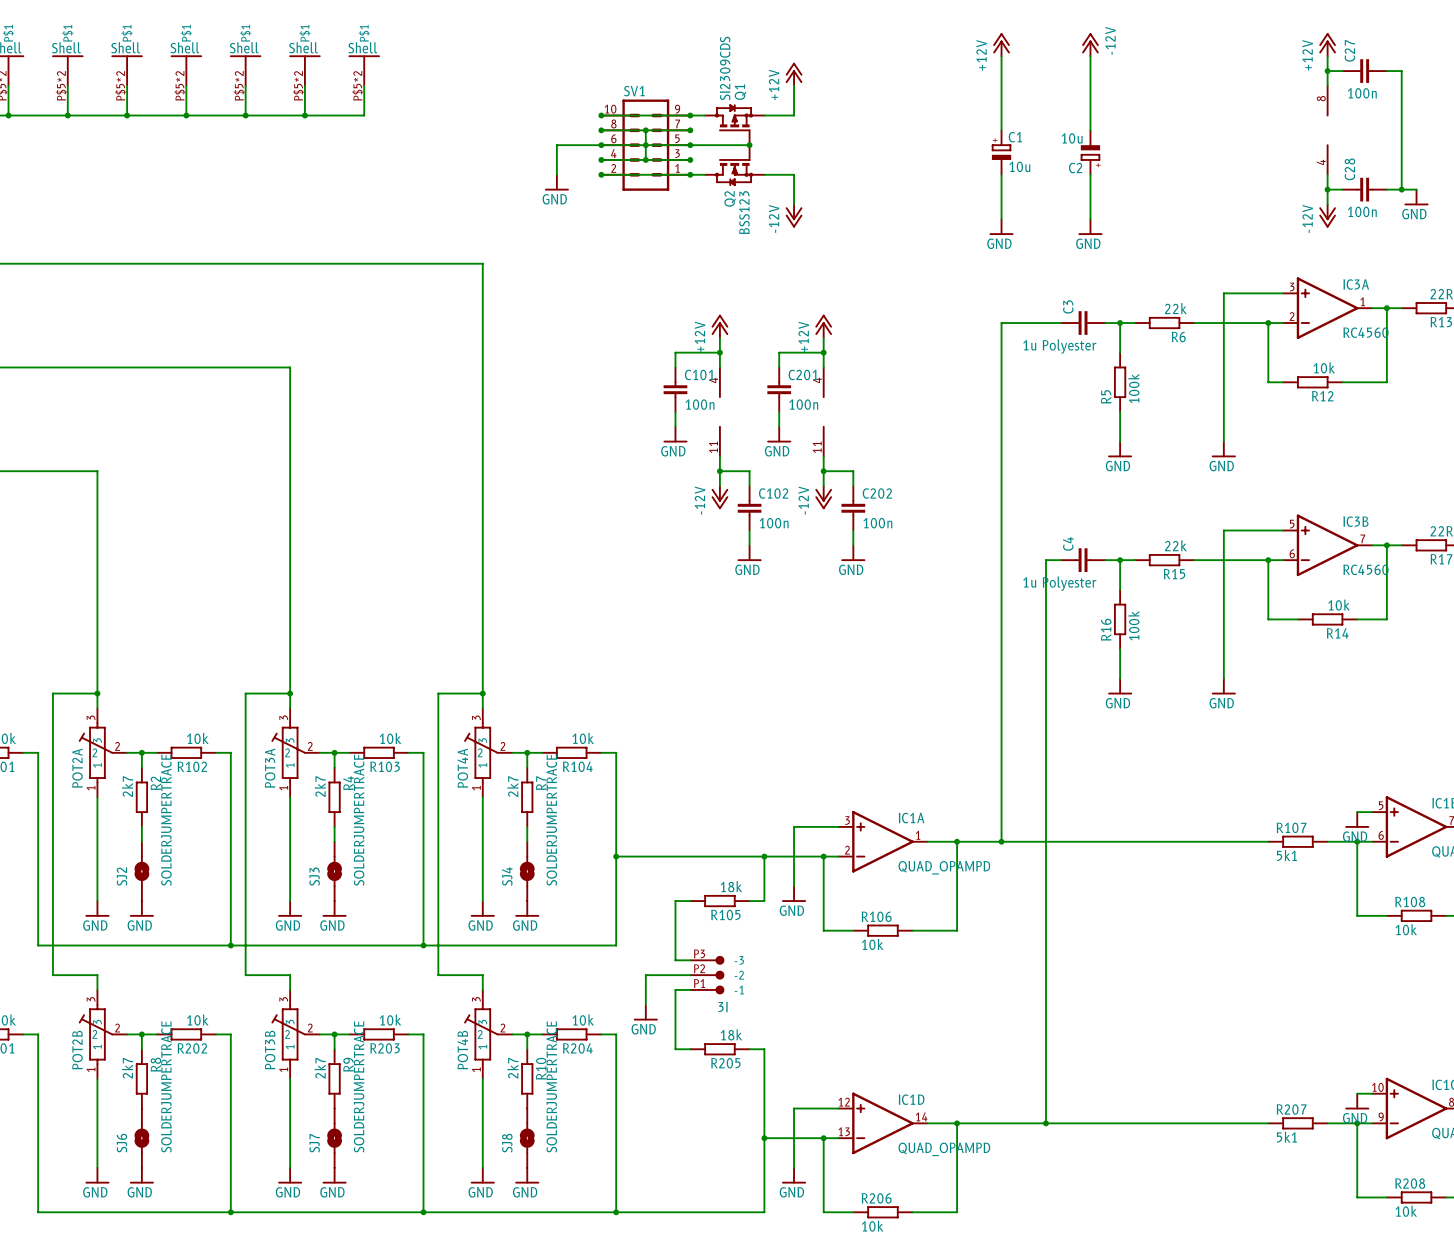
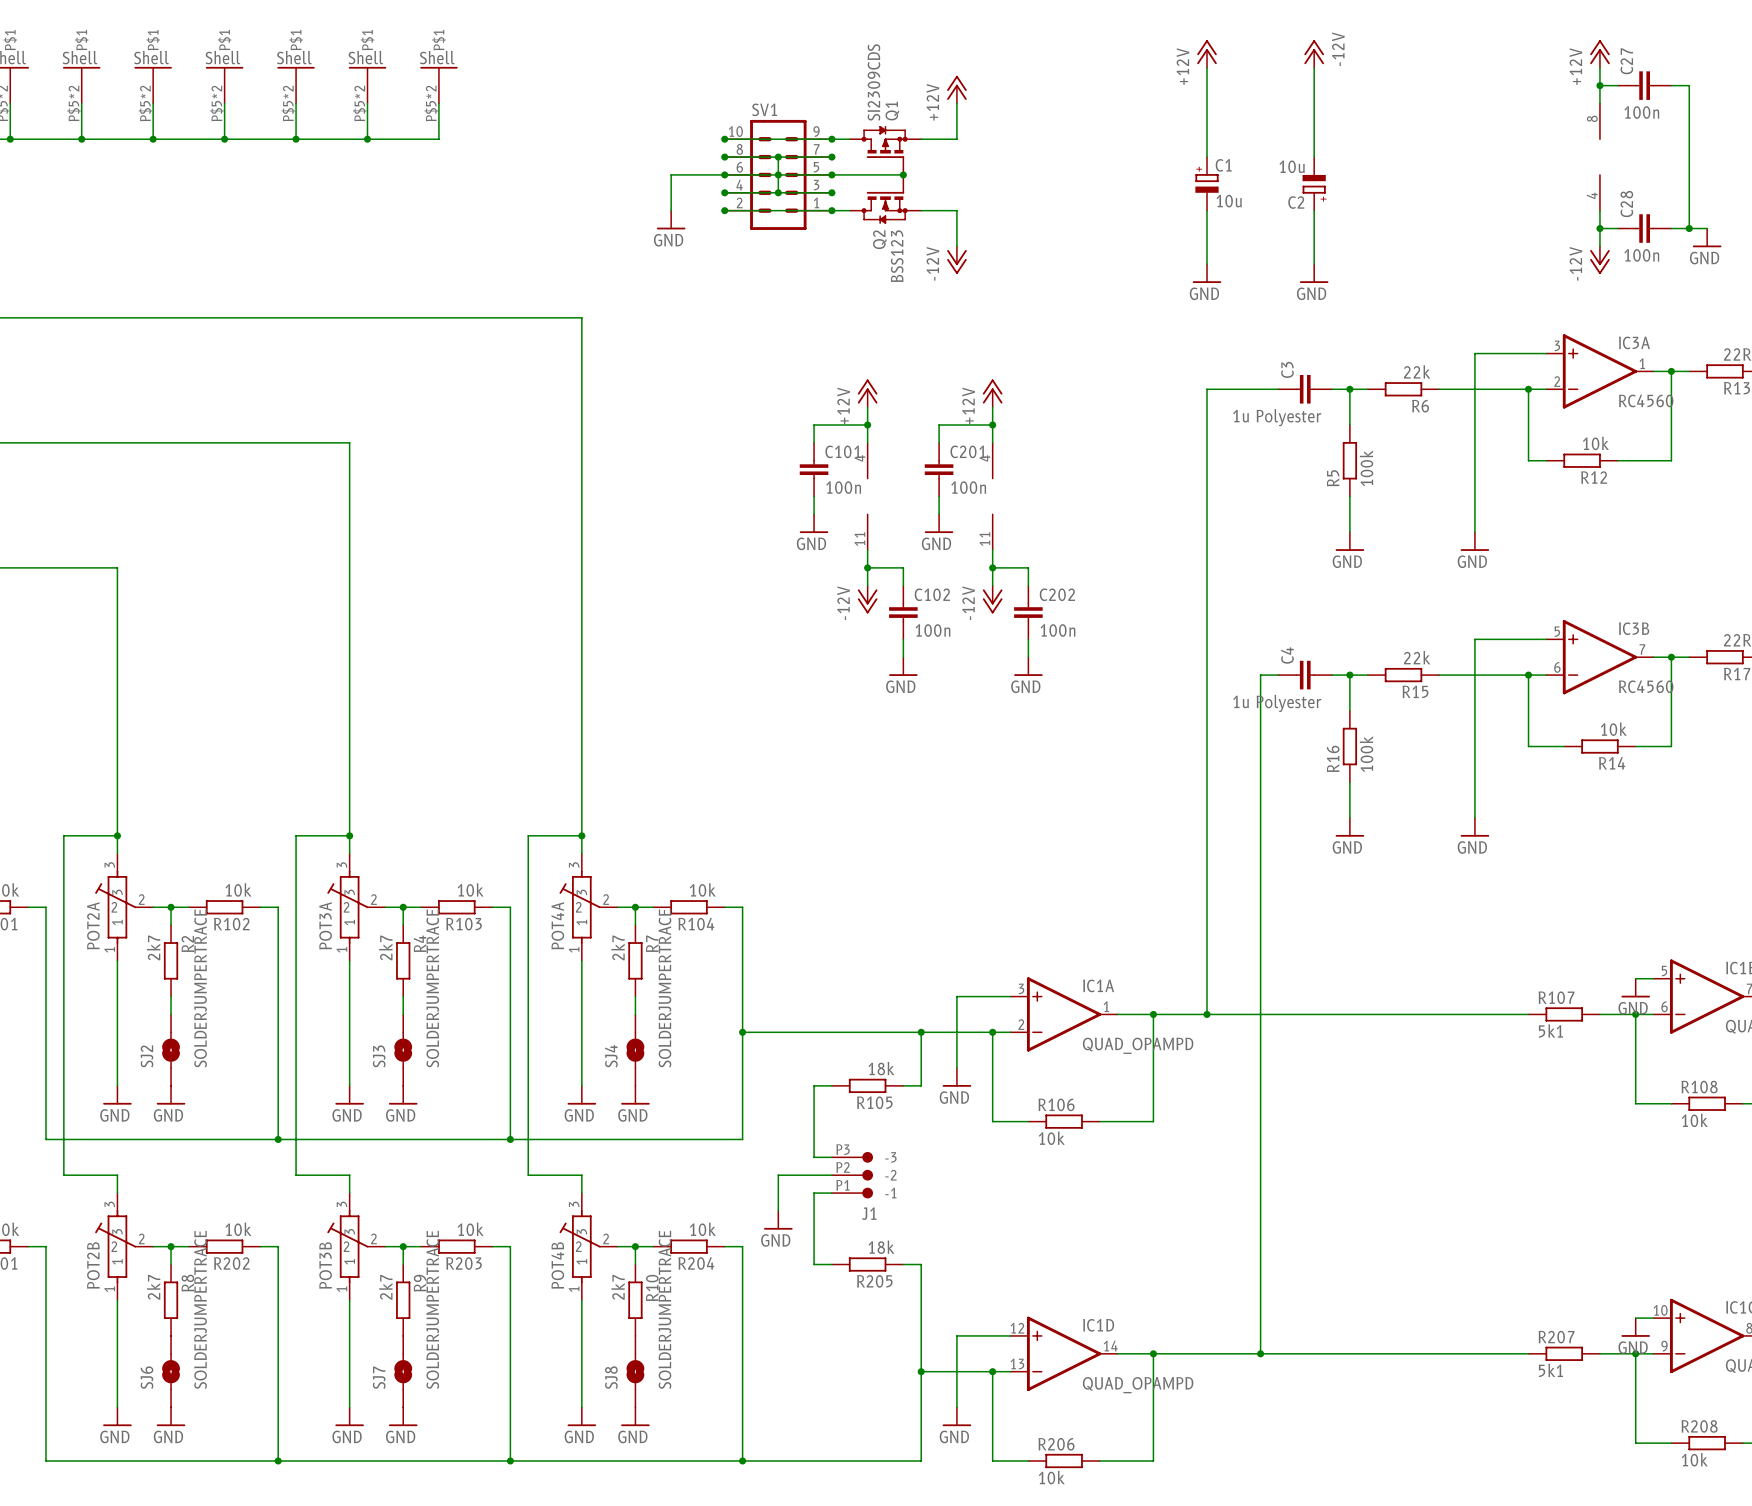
3I name: 3I (722, 1007) -> J1 (869, 1213)

